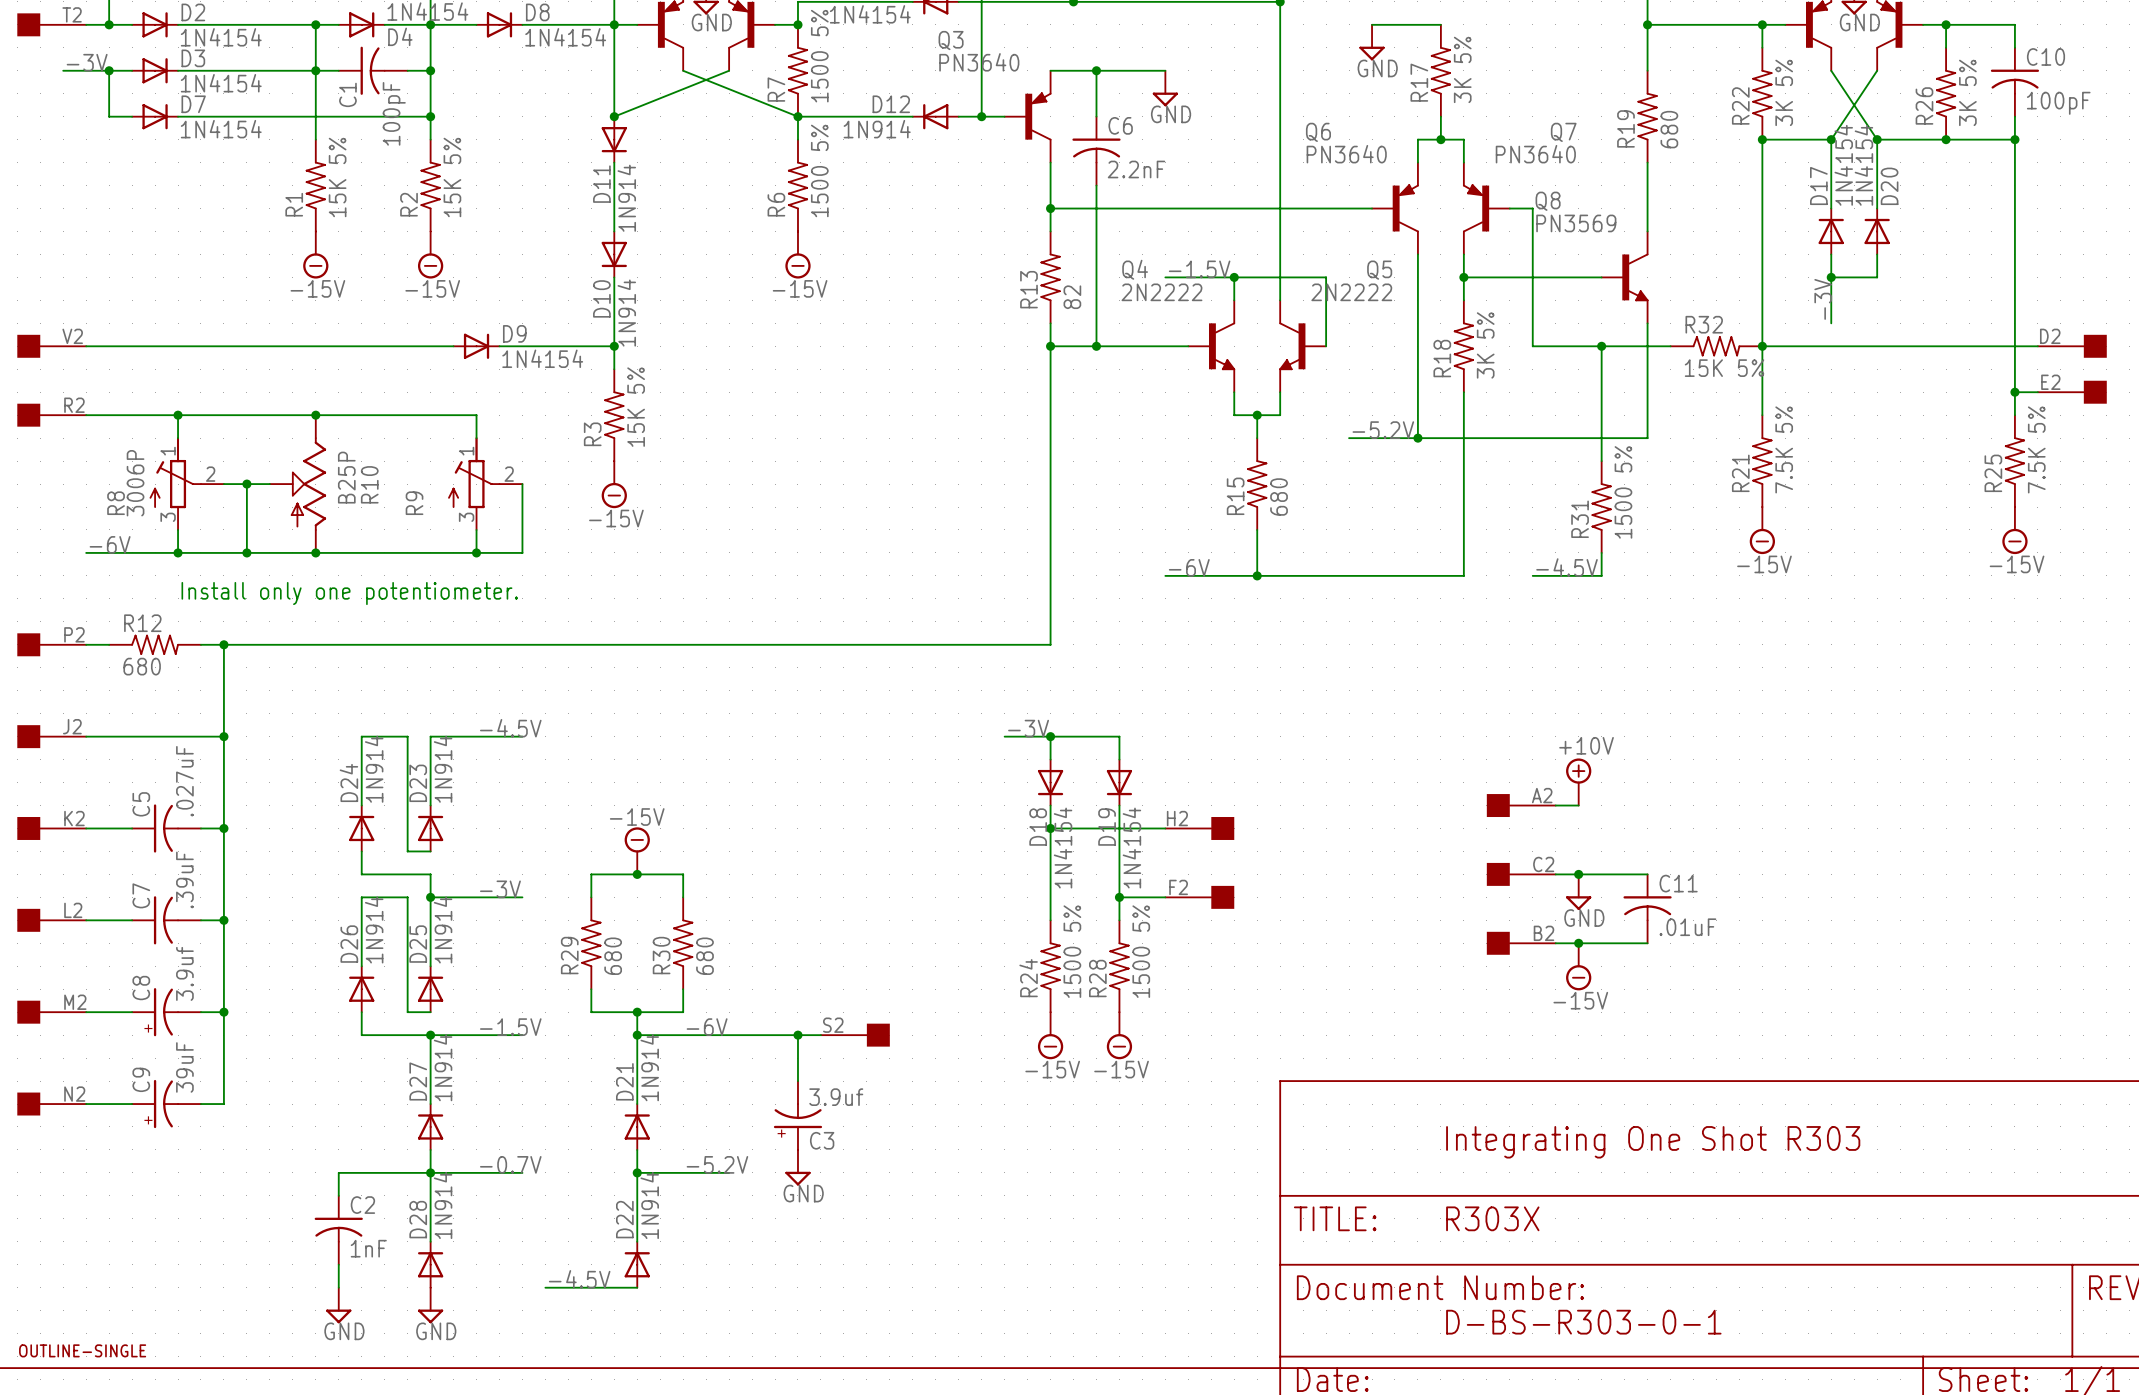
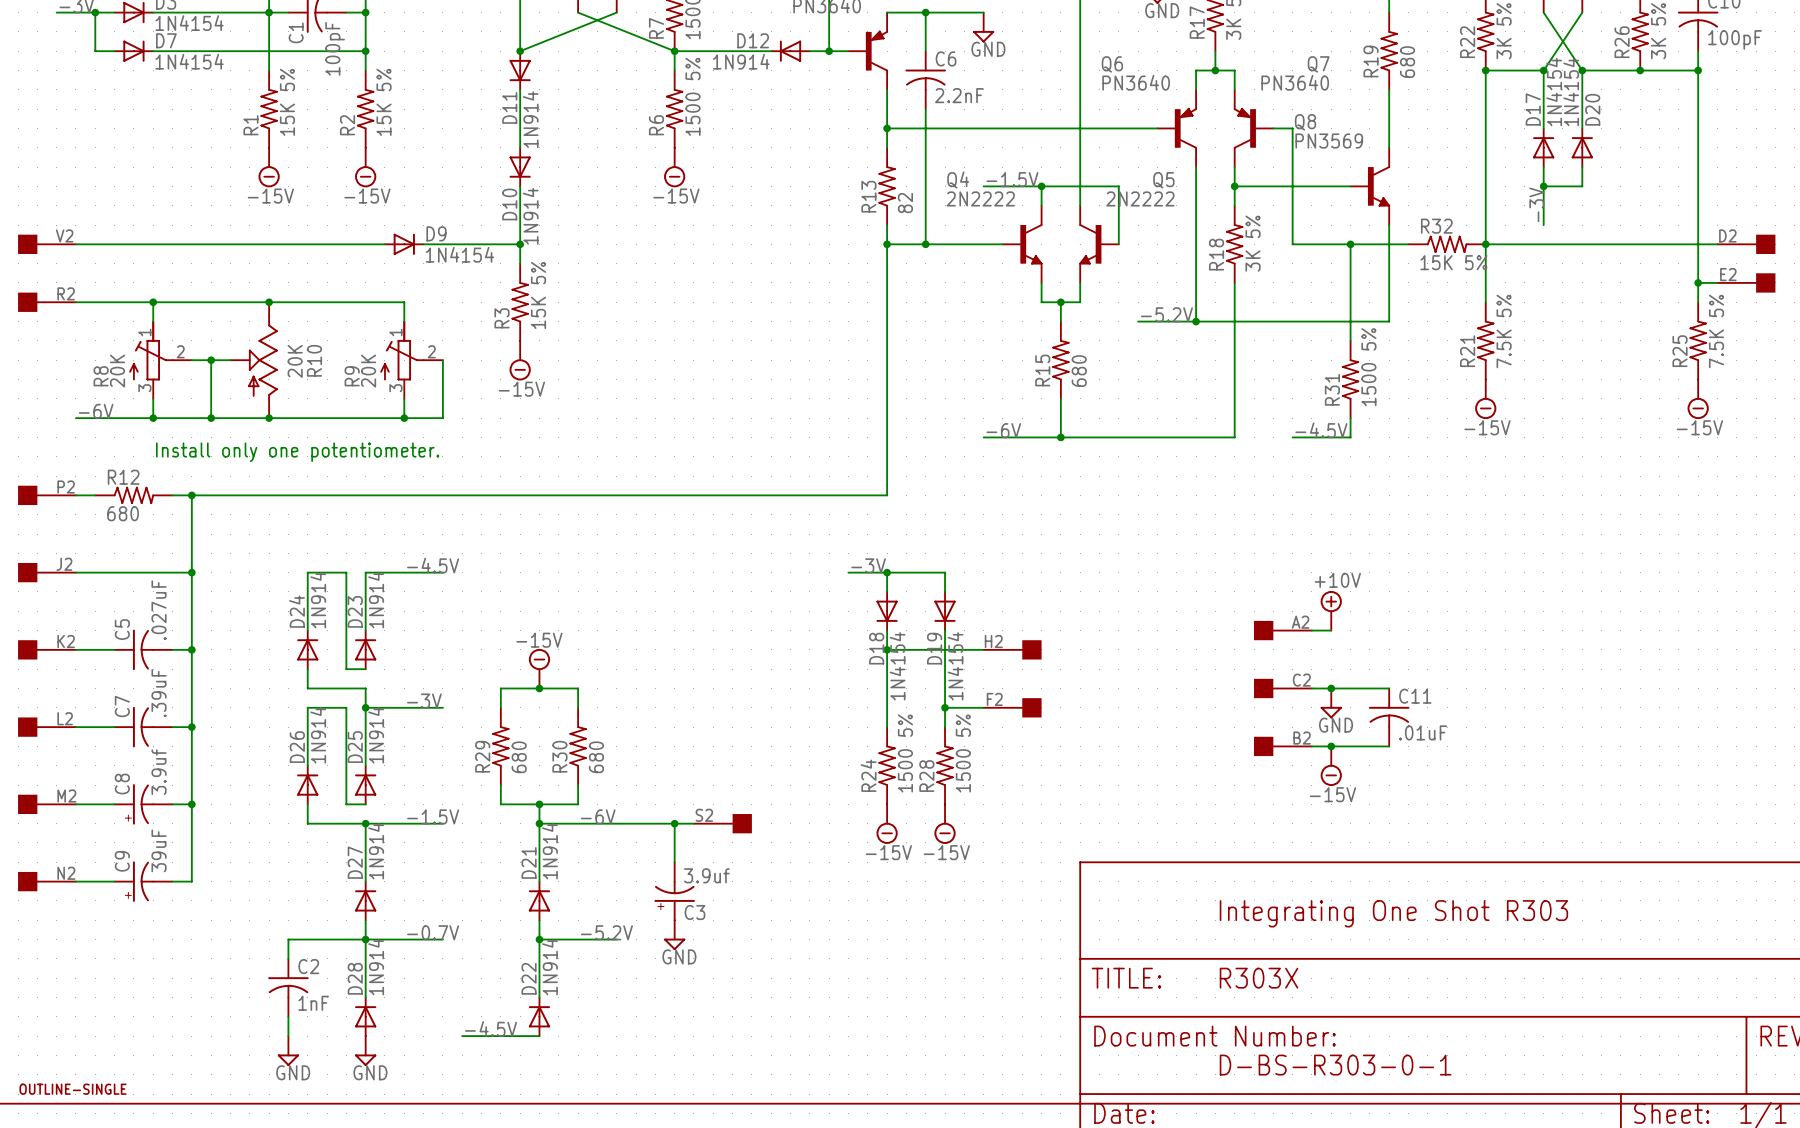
R10 value: B25P (346, 477) -> 20K (295, 361)
R8 value: 3006P (135, 483) -> 20K (117, 371)
R9 value: none -> 20K (368, 371)

